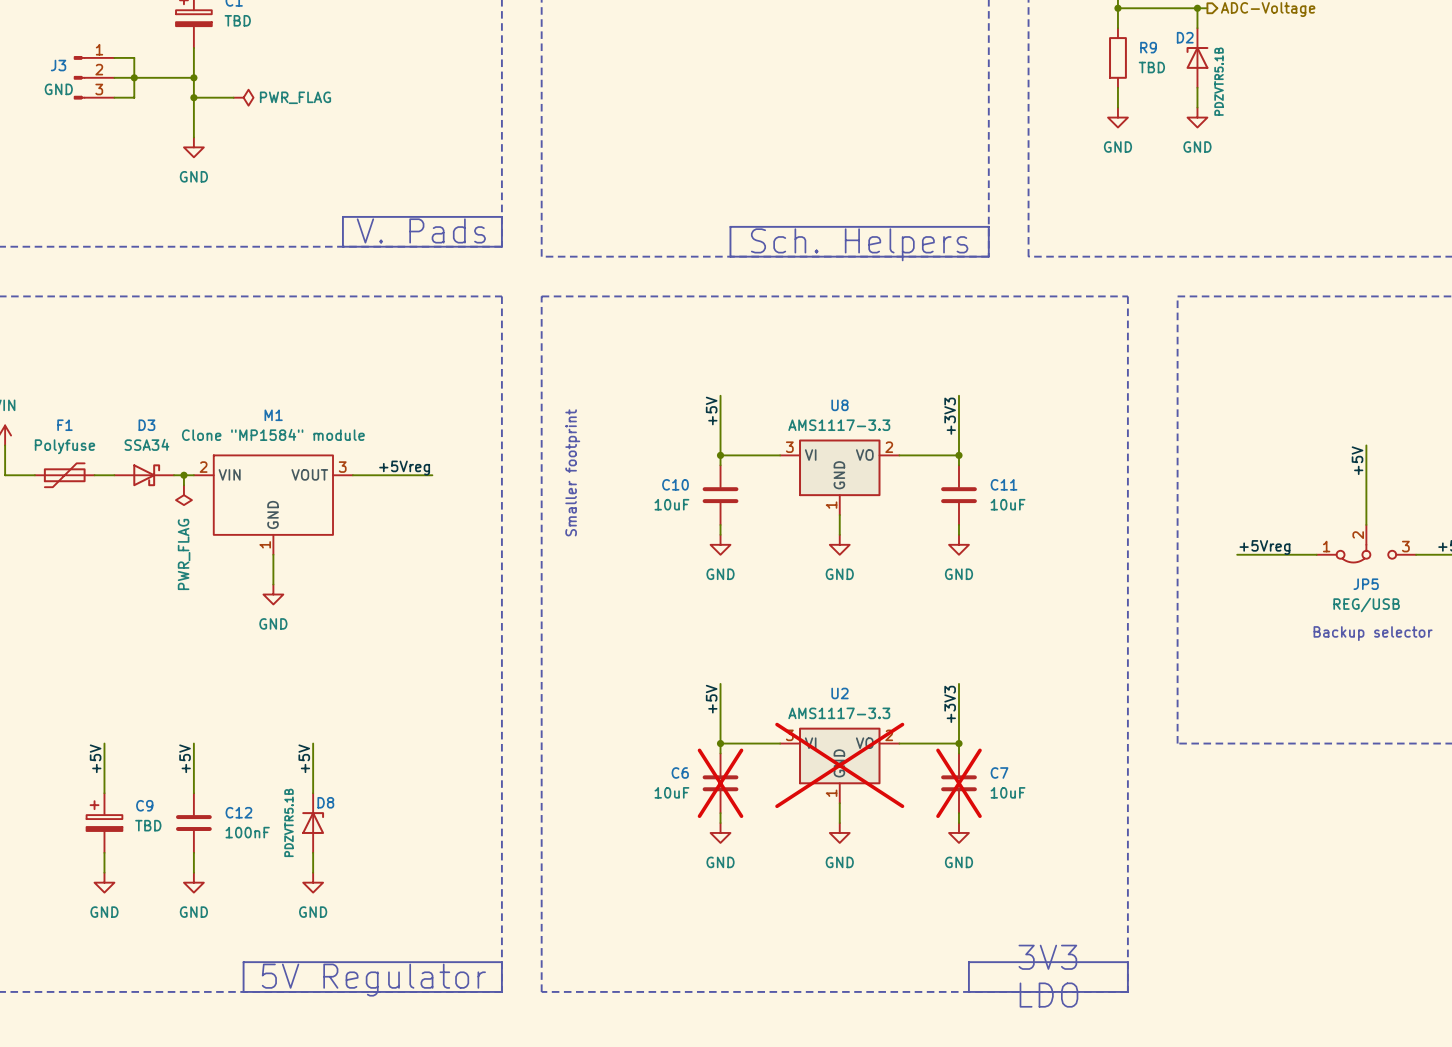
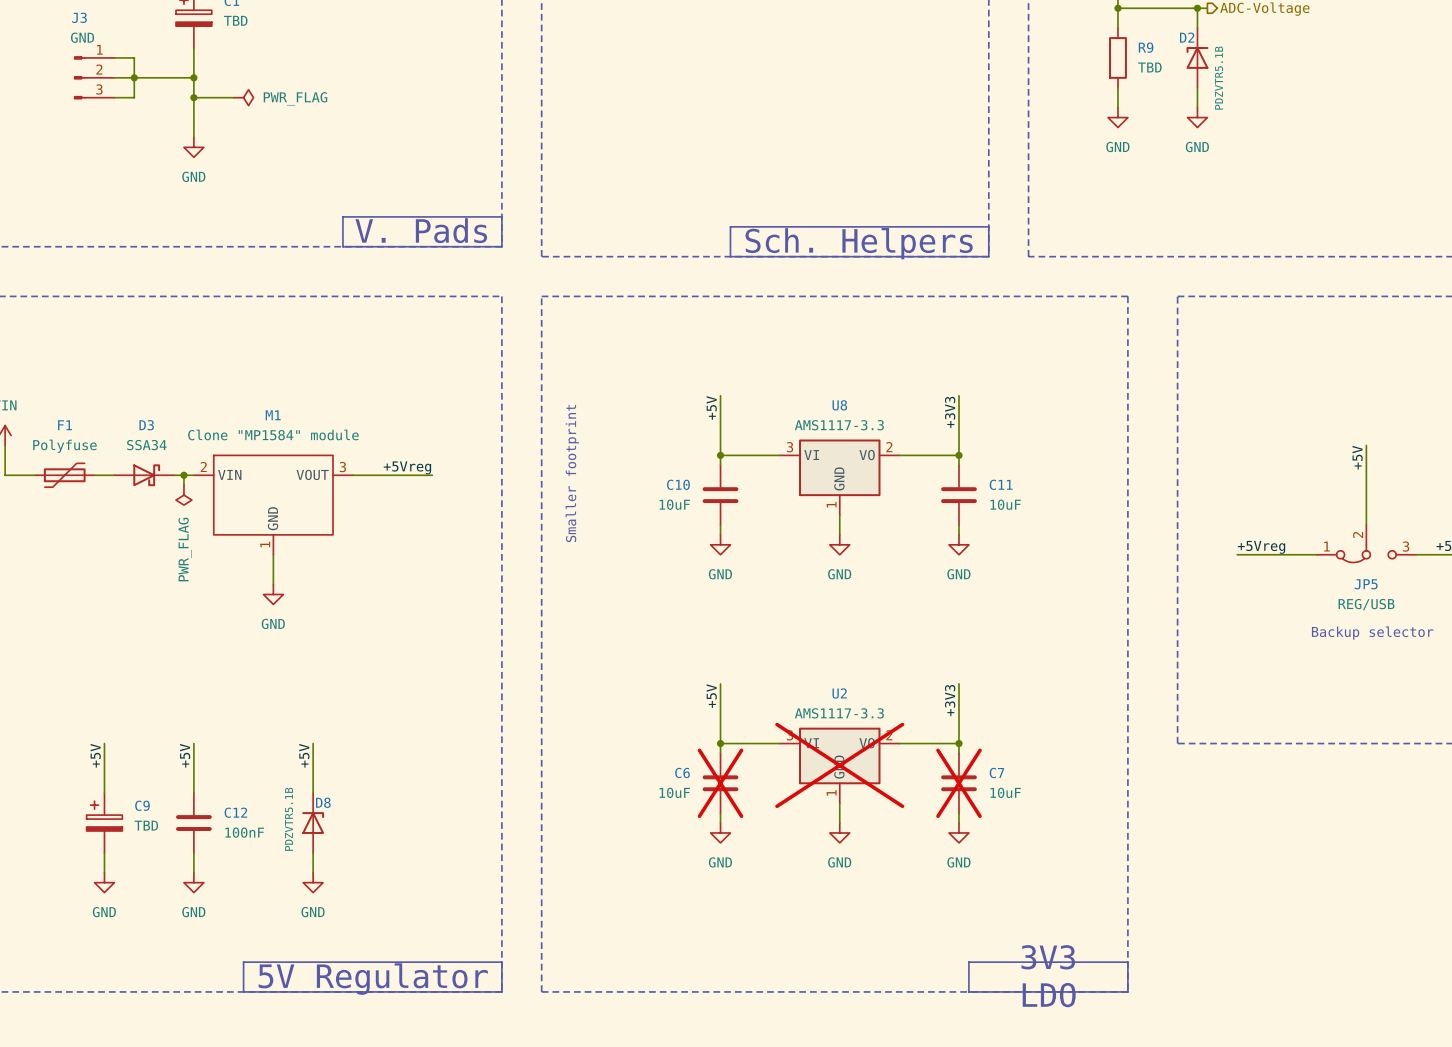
J3 name position: J3 (58, 65) -> J3 (79, 17)
J3 value position: GND (58, 89) -> GND (82, 37)

